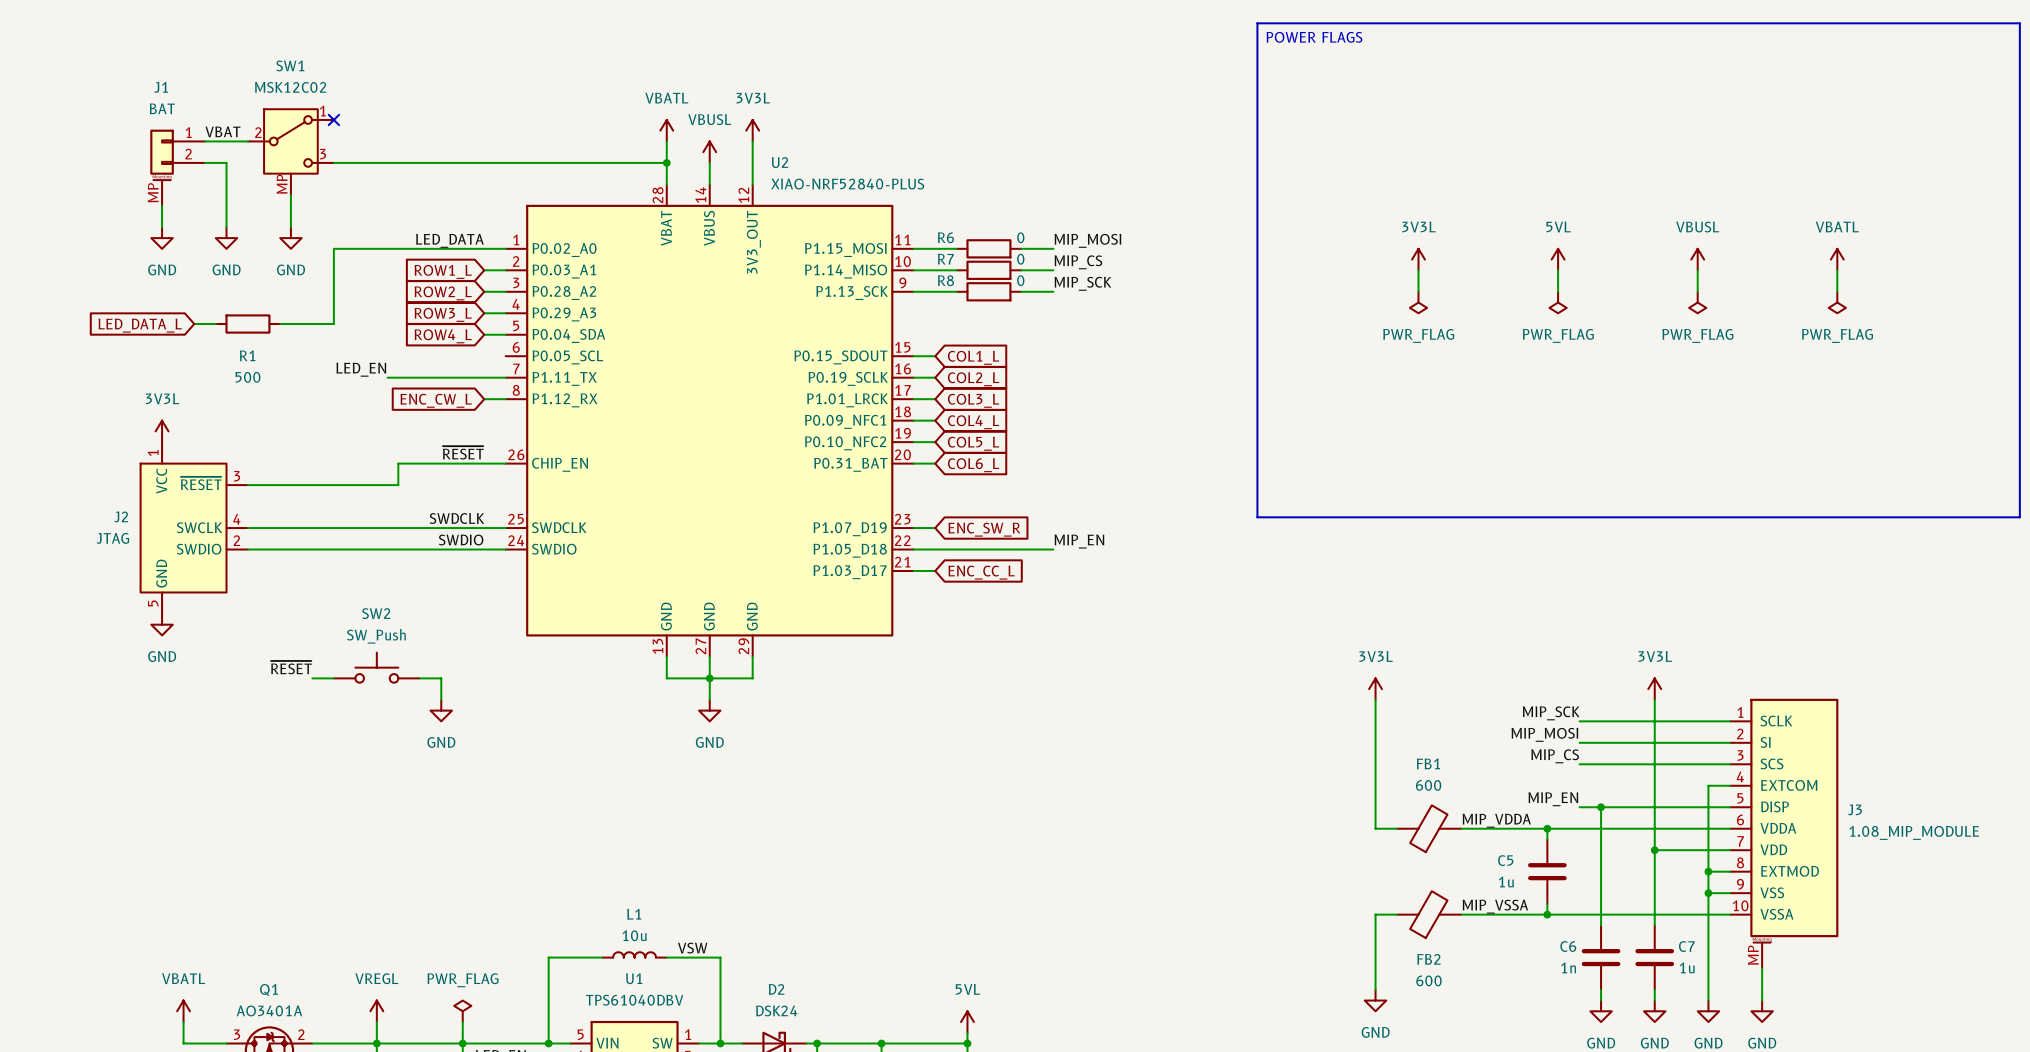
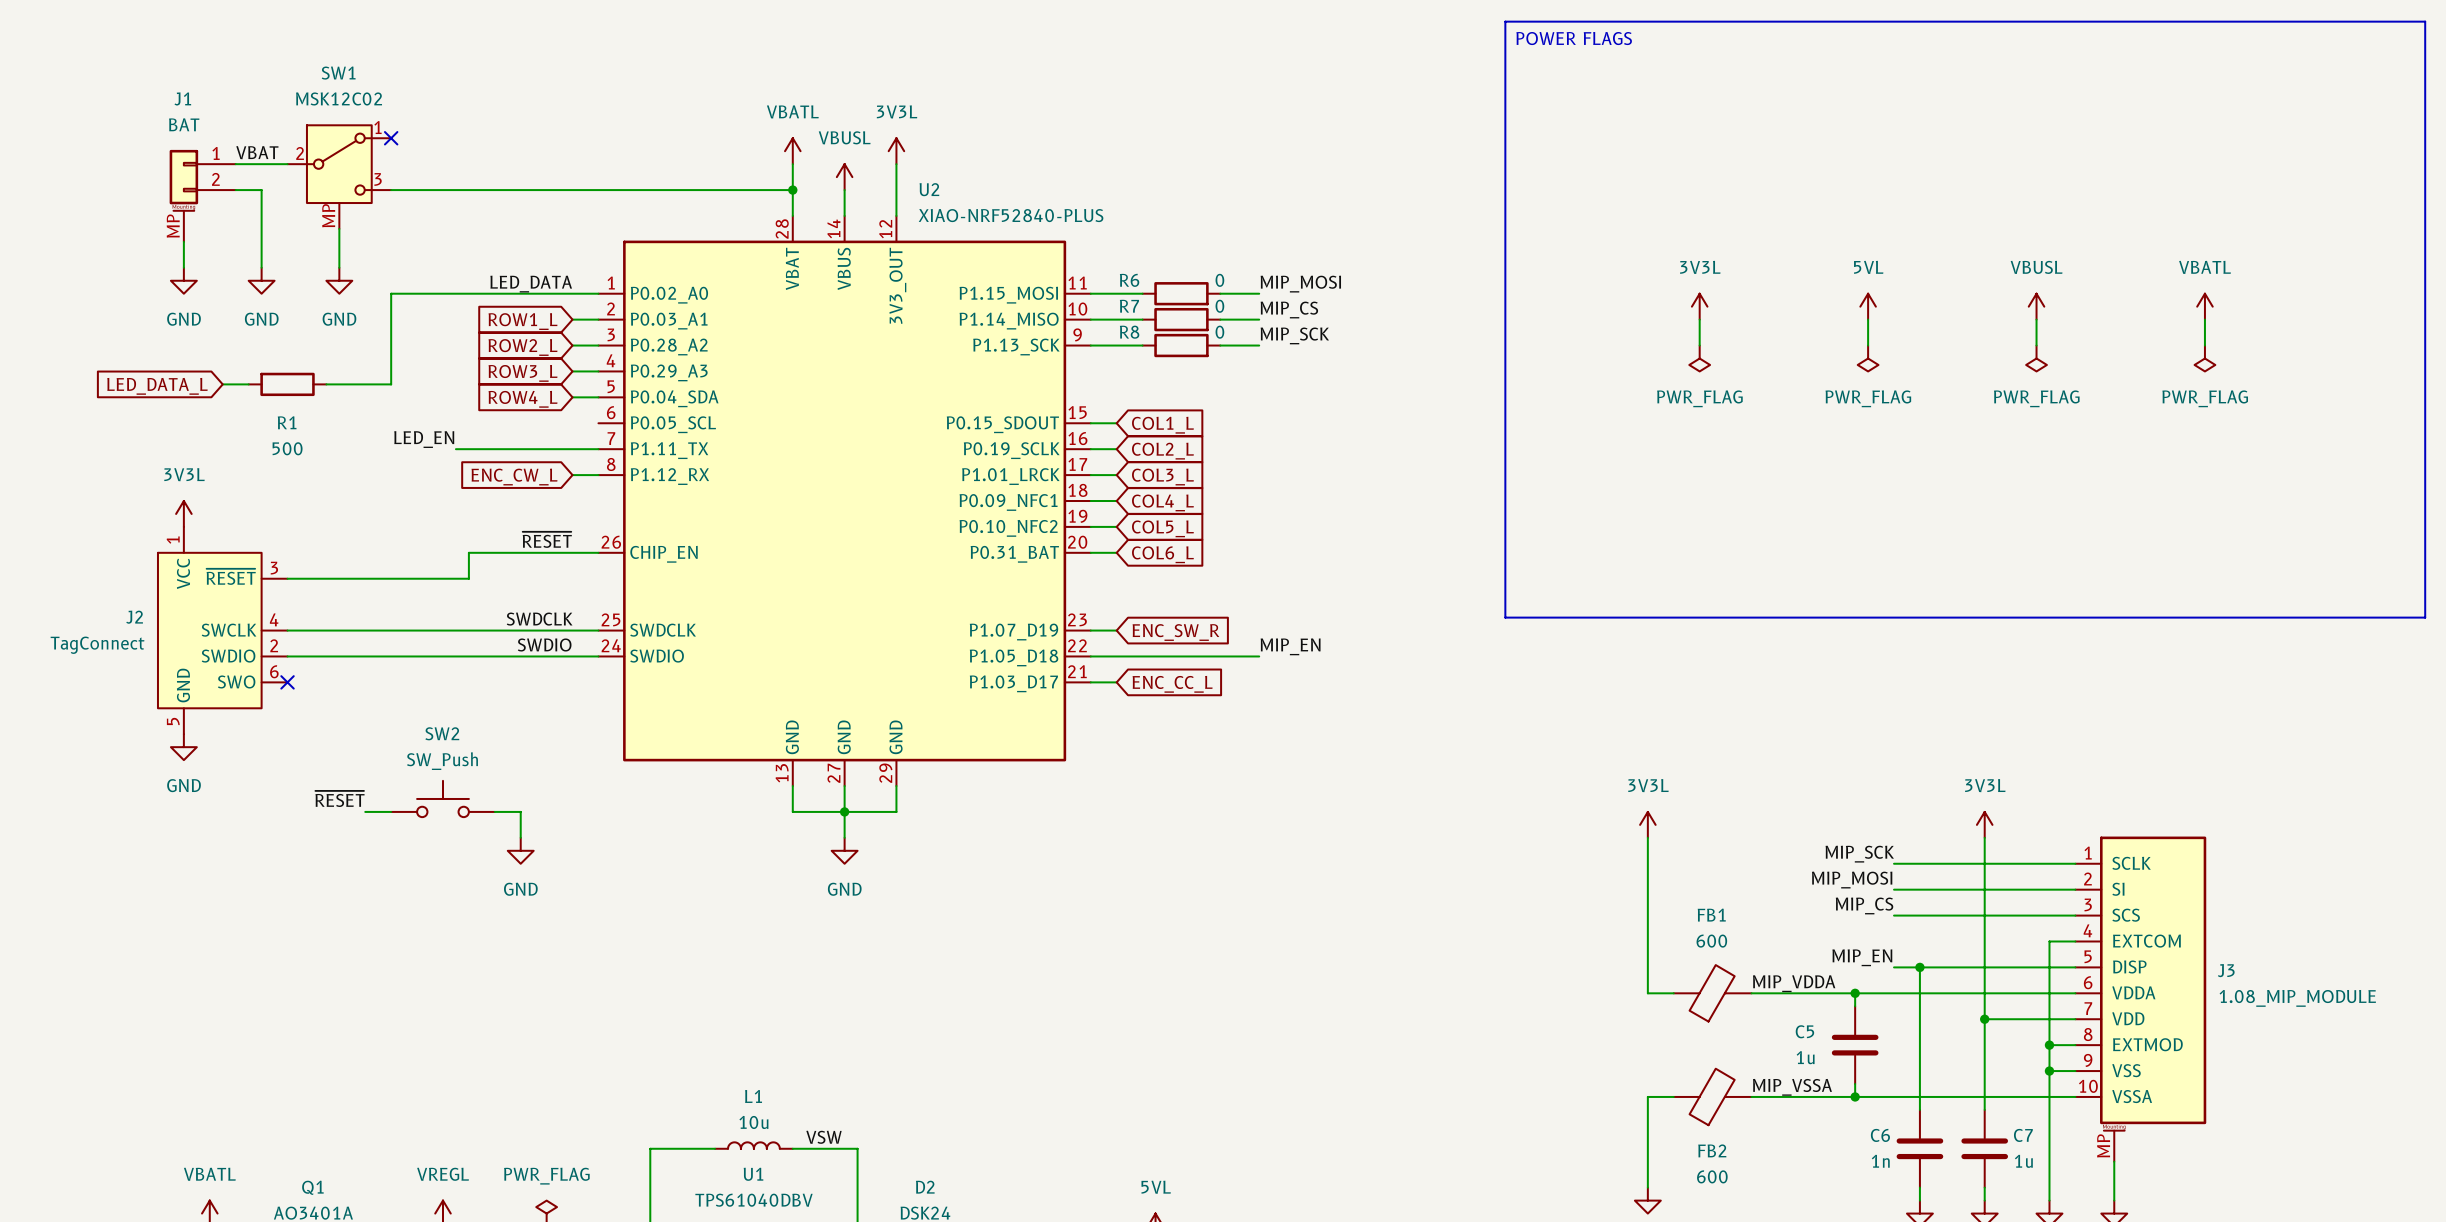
J2 symbol: [140, 442, 248, 614] -> [157, 526, 288, 735]
J2 value: JTAG (112, 538) -> TagConnect (97, 645)
no-connect mark: none -> (287, 682)

